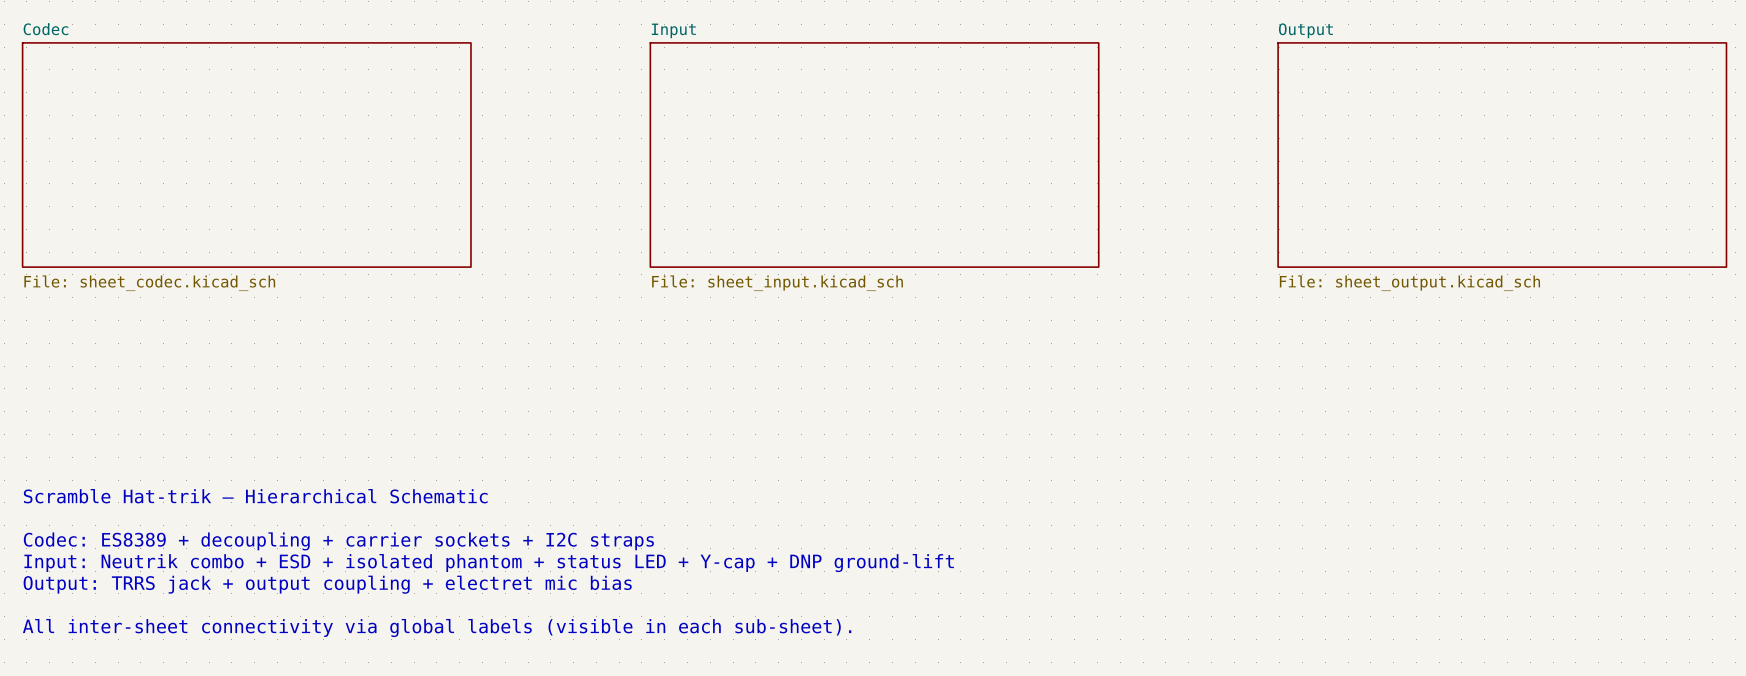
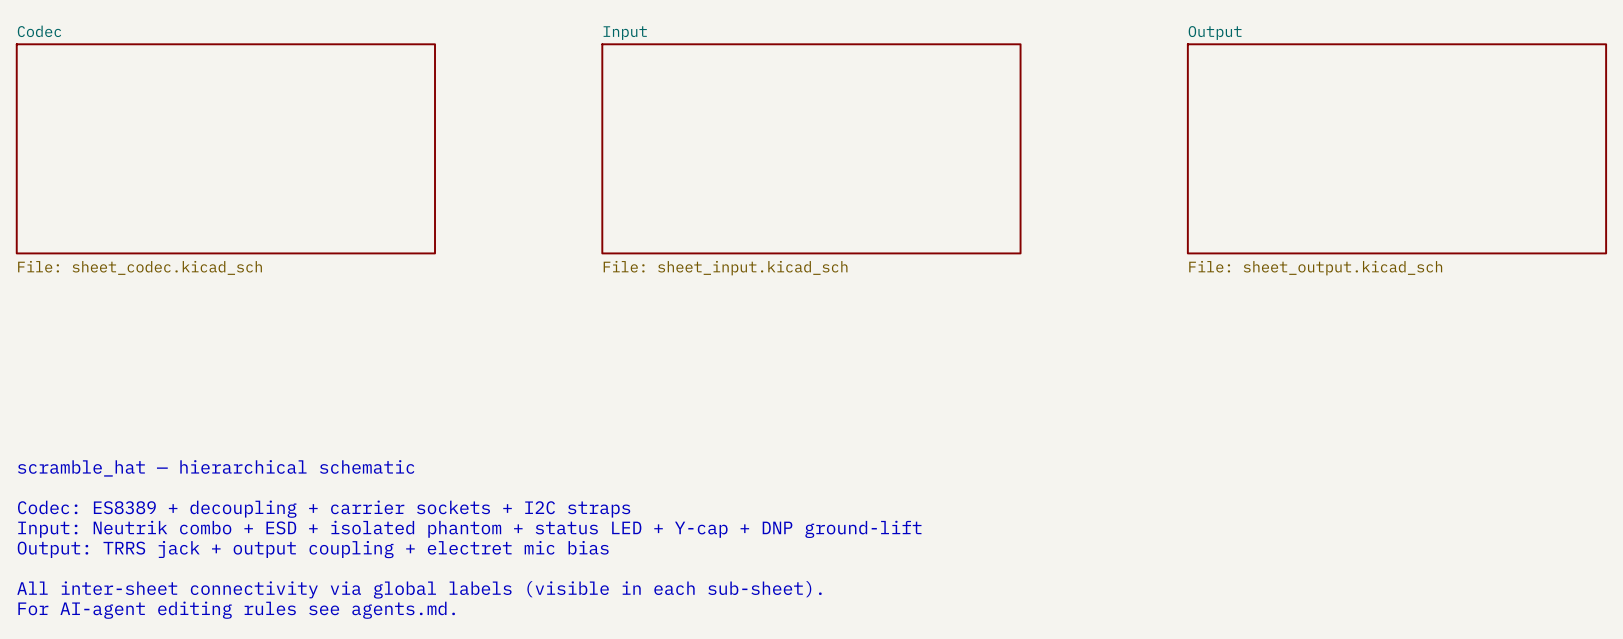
text: Scramble Hat-trik — Hierarchical Schematic (255, 496) -> scramble_hat — hierarchical schematic (216, 468)
text: none -> For AI-agent editing rules see agents.md. (236, 610)

